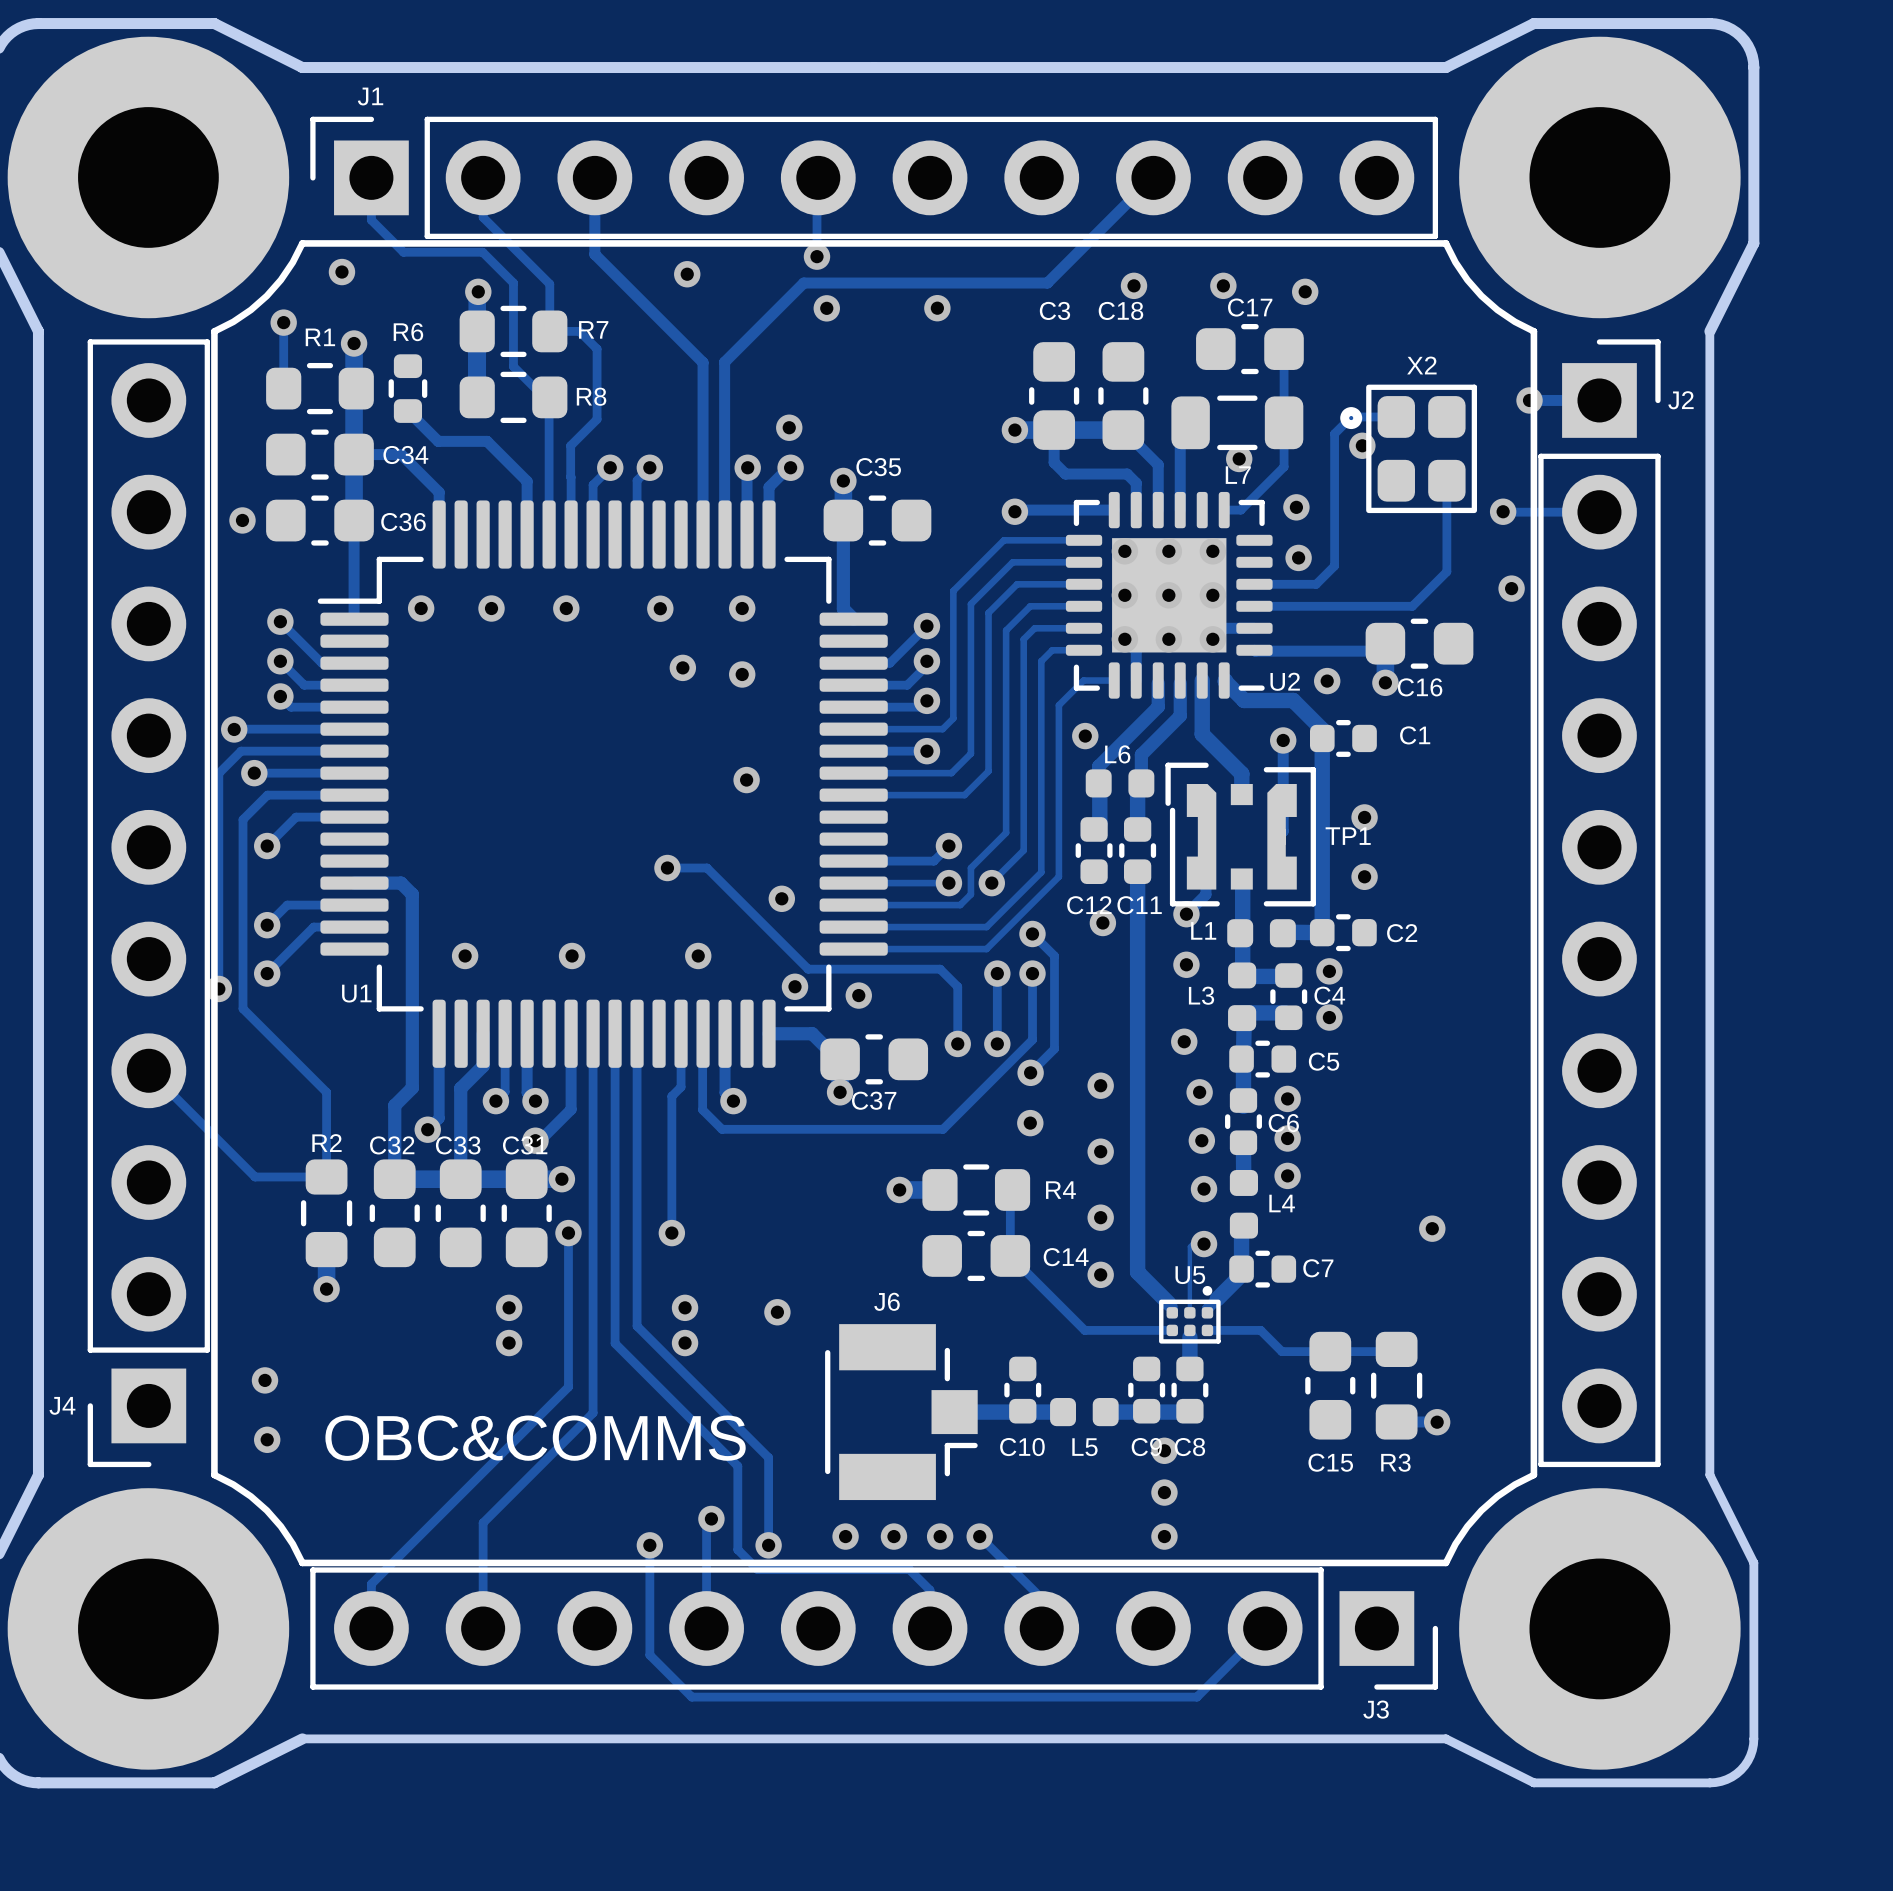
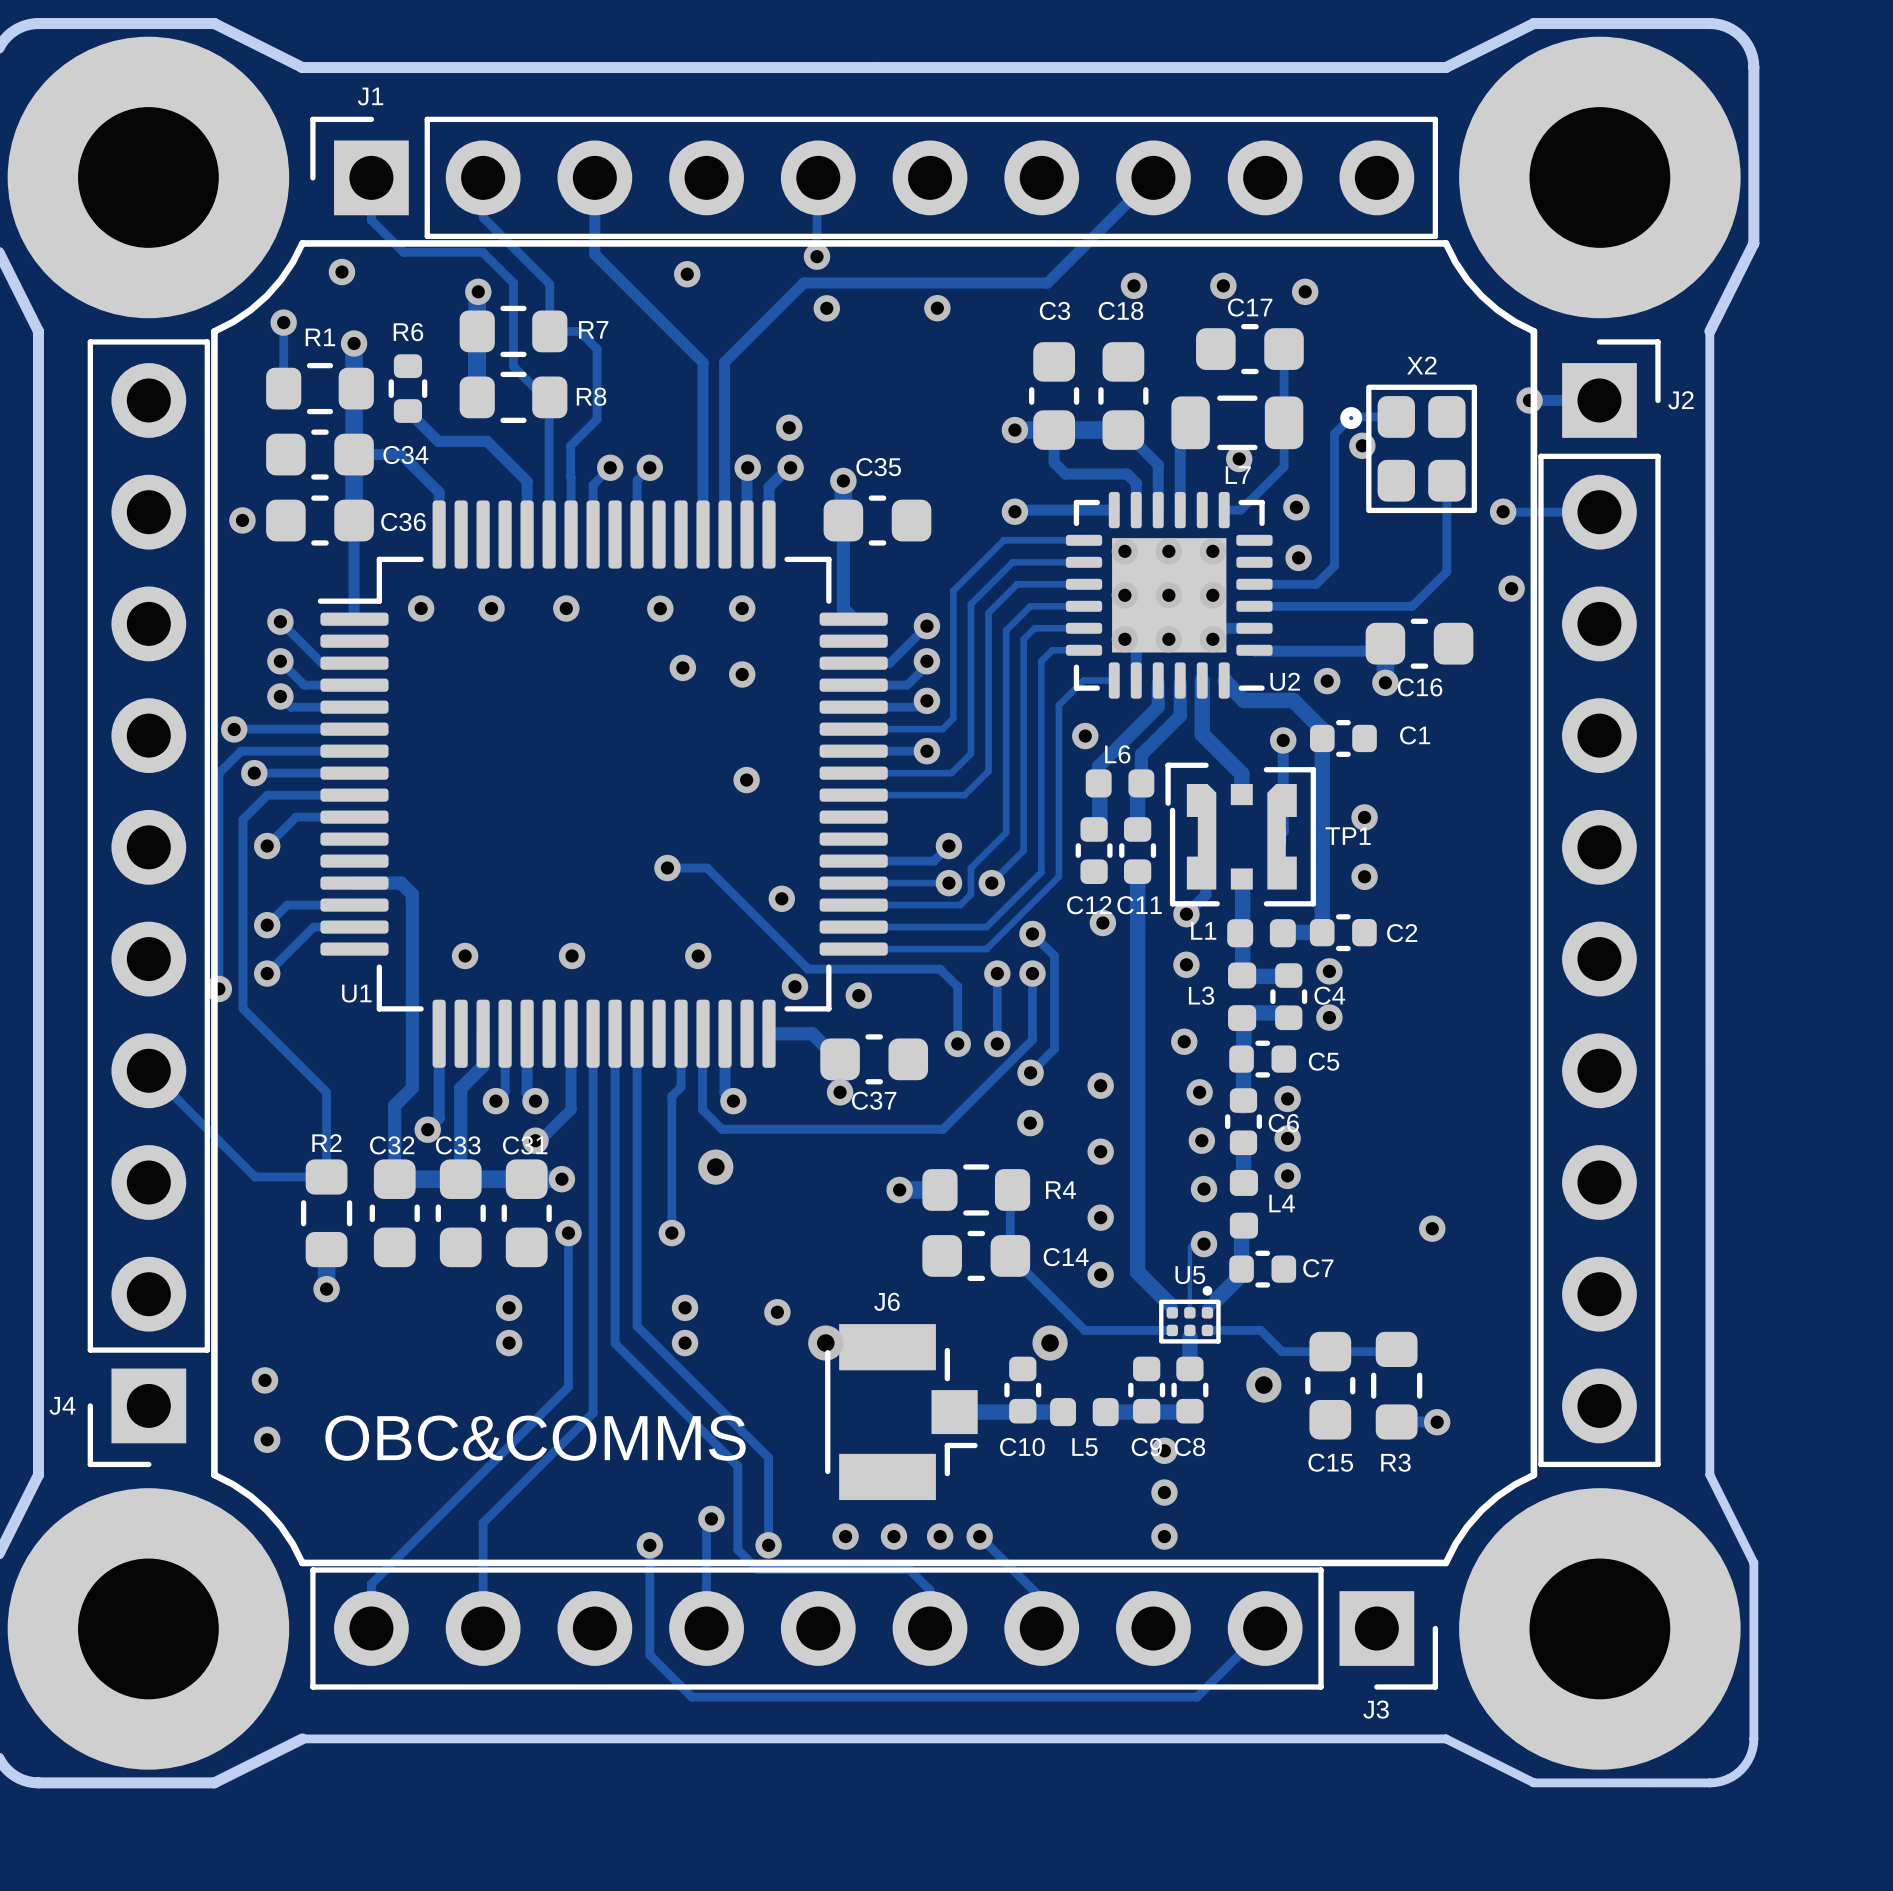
via: none -> (715, 1167)
via: none -> (825, 1343)
via: none -> (1050, 1343)
via: none -> (1263, 1385)

